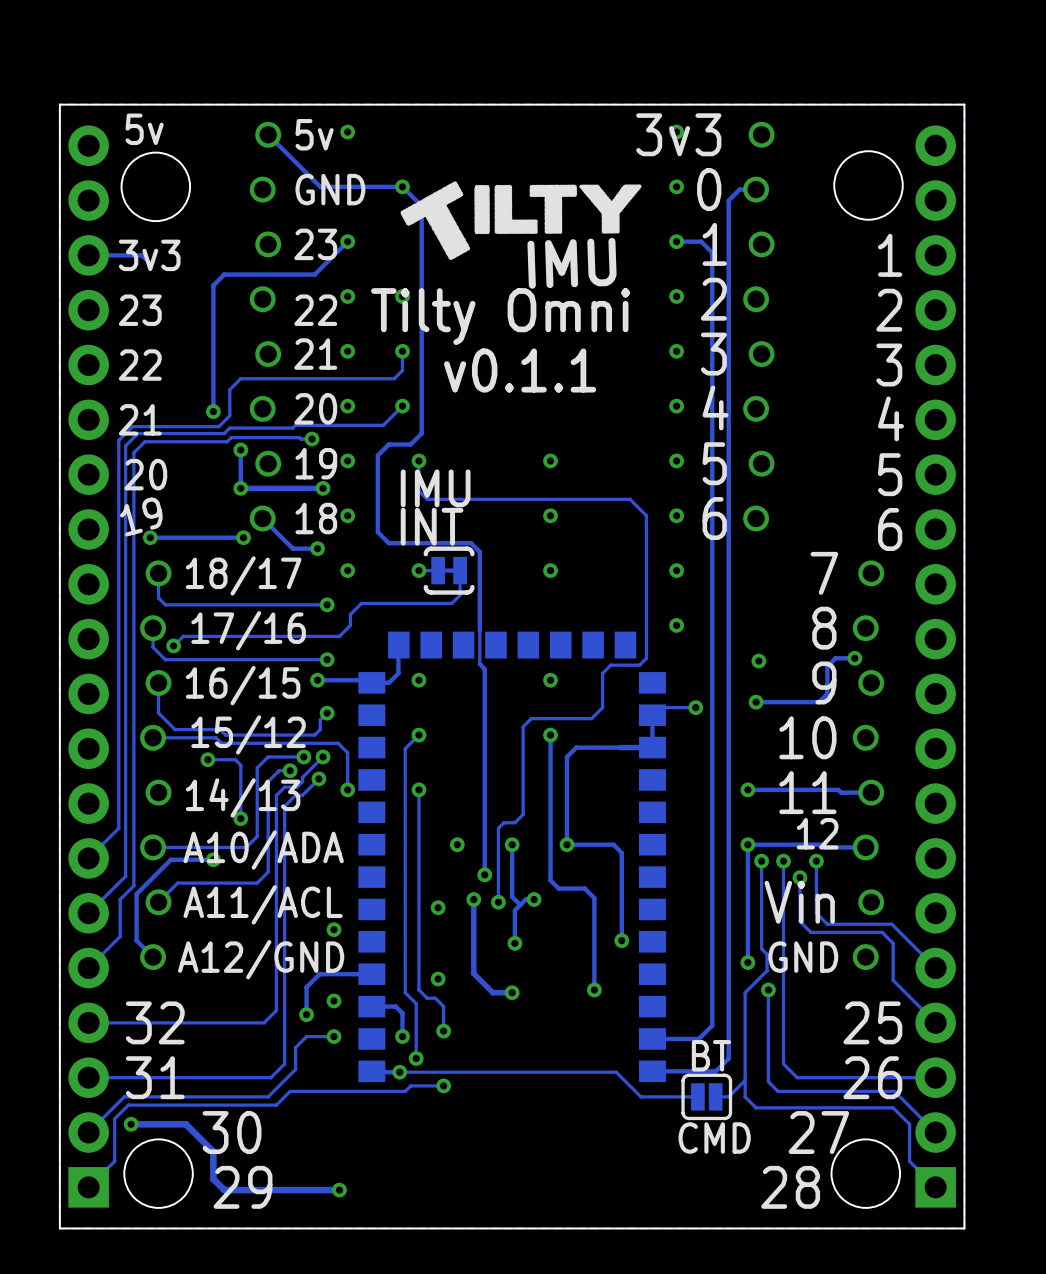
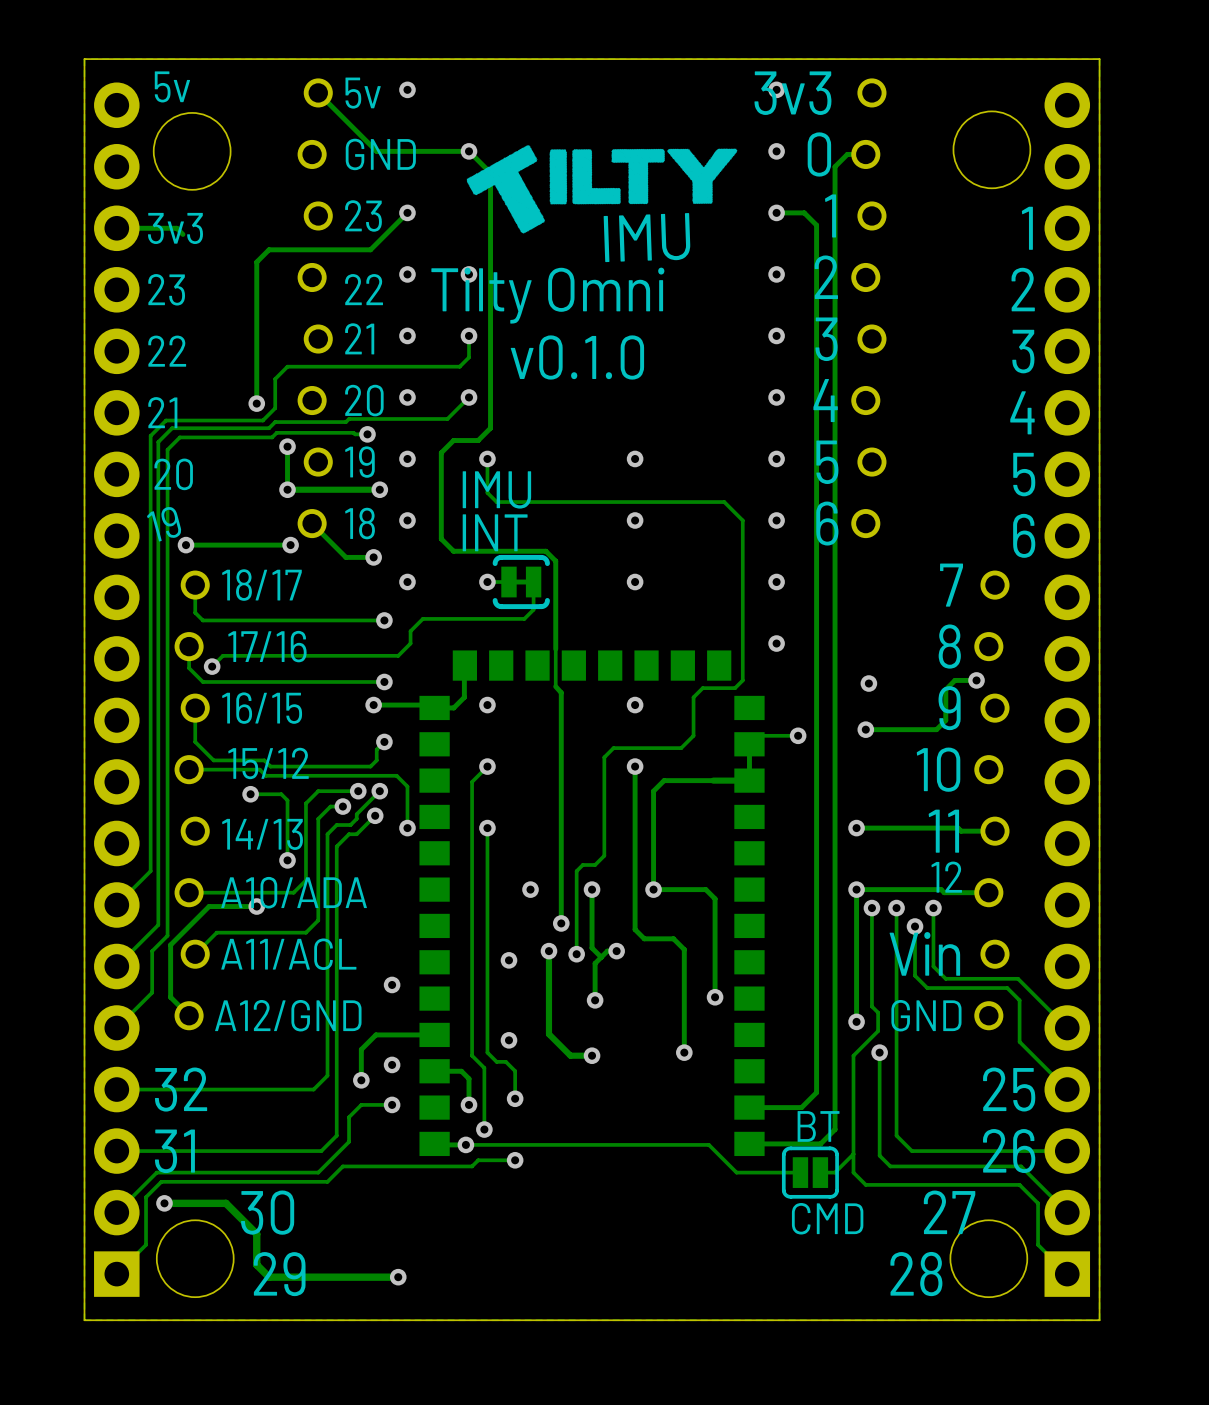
text: v0.1.1 (520, 370) -> v0.1.0 (577, 357)

